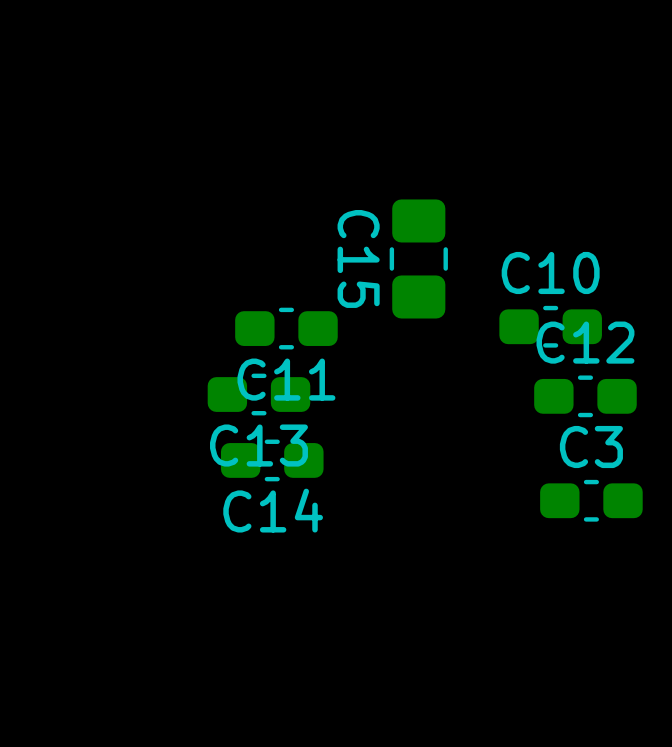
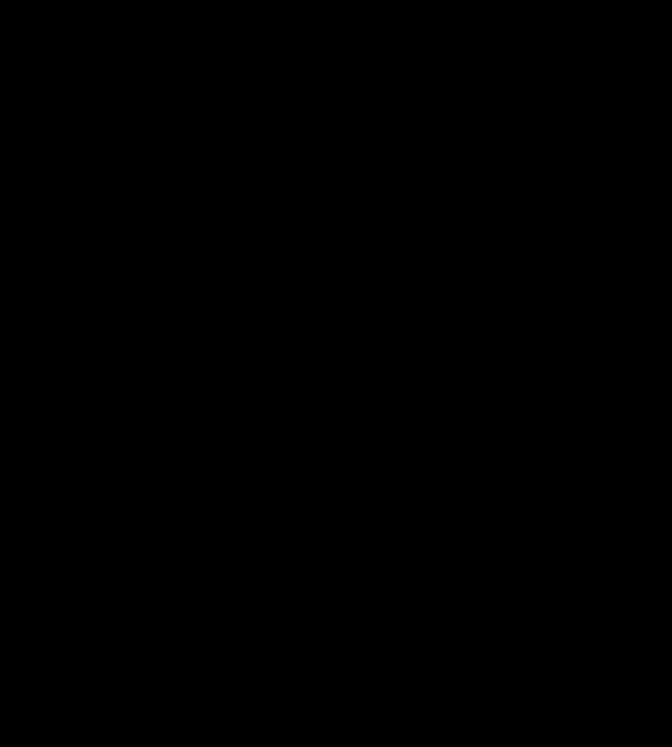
C15: (418, 258) -> none
C10: (550, 326) -> none
C11: (286, 328) -> none
C13: (258, 394) -> none
C12: (585, 396) -> none
C14: (272, 460) -> none
C3: (591, 500) -> none

